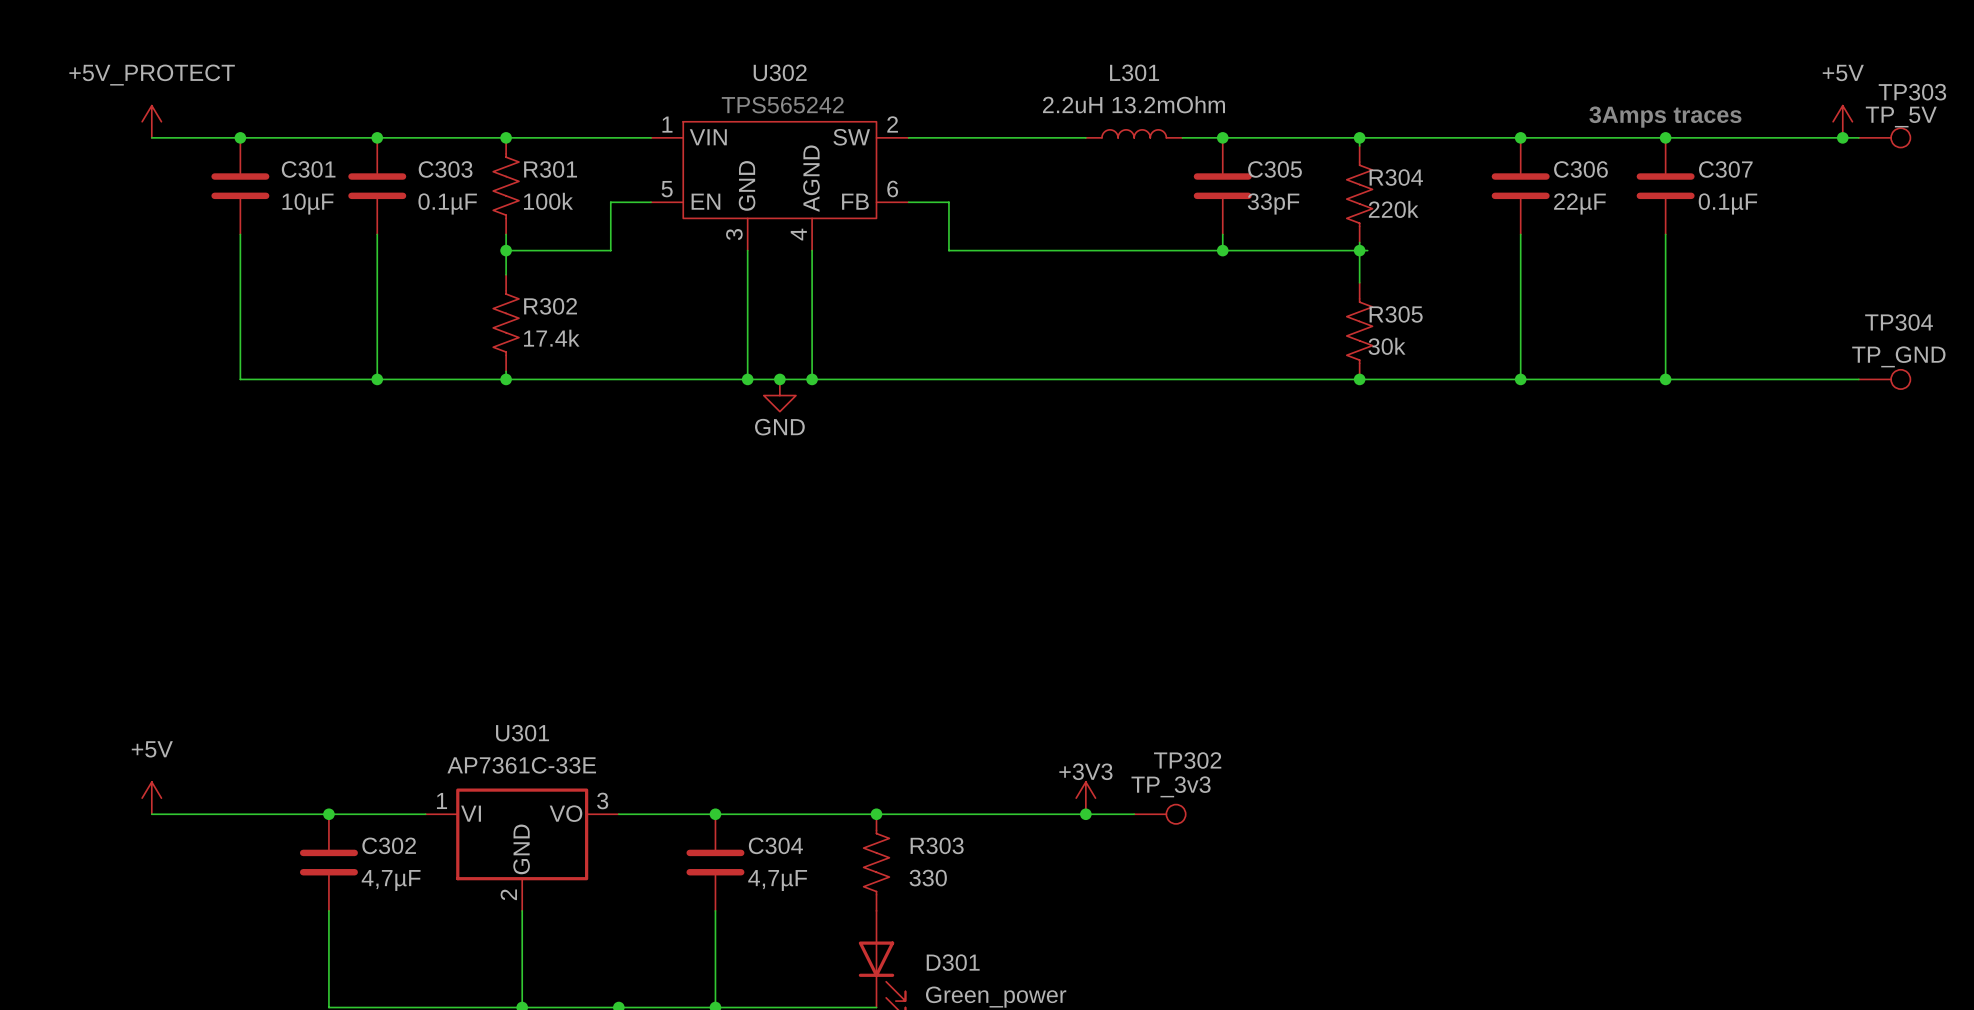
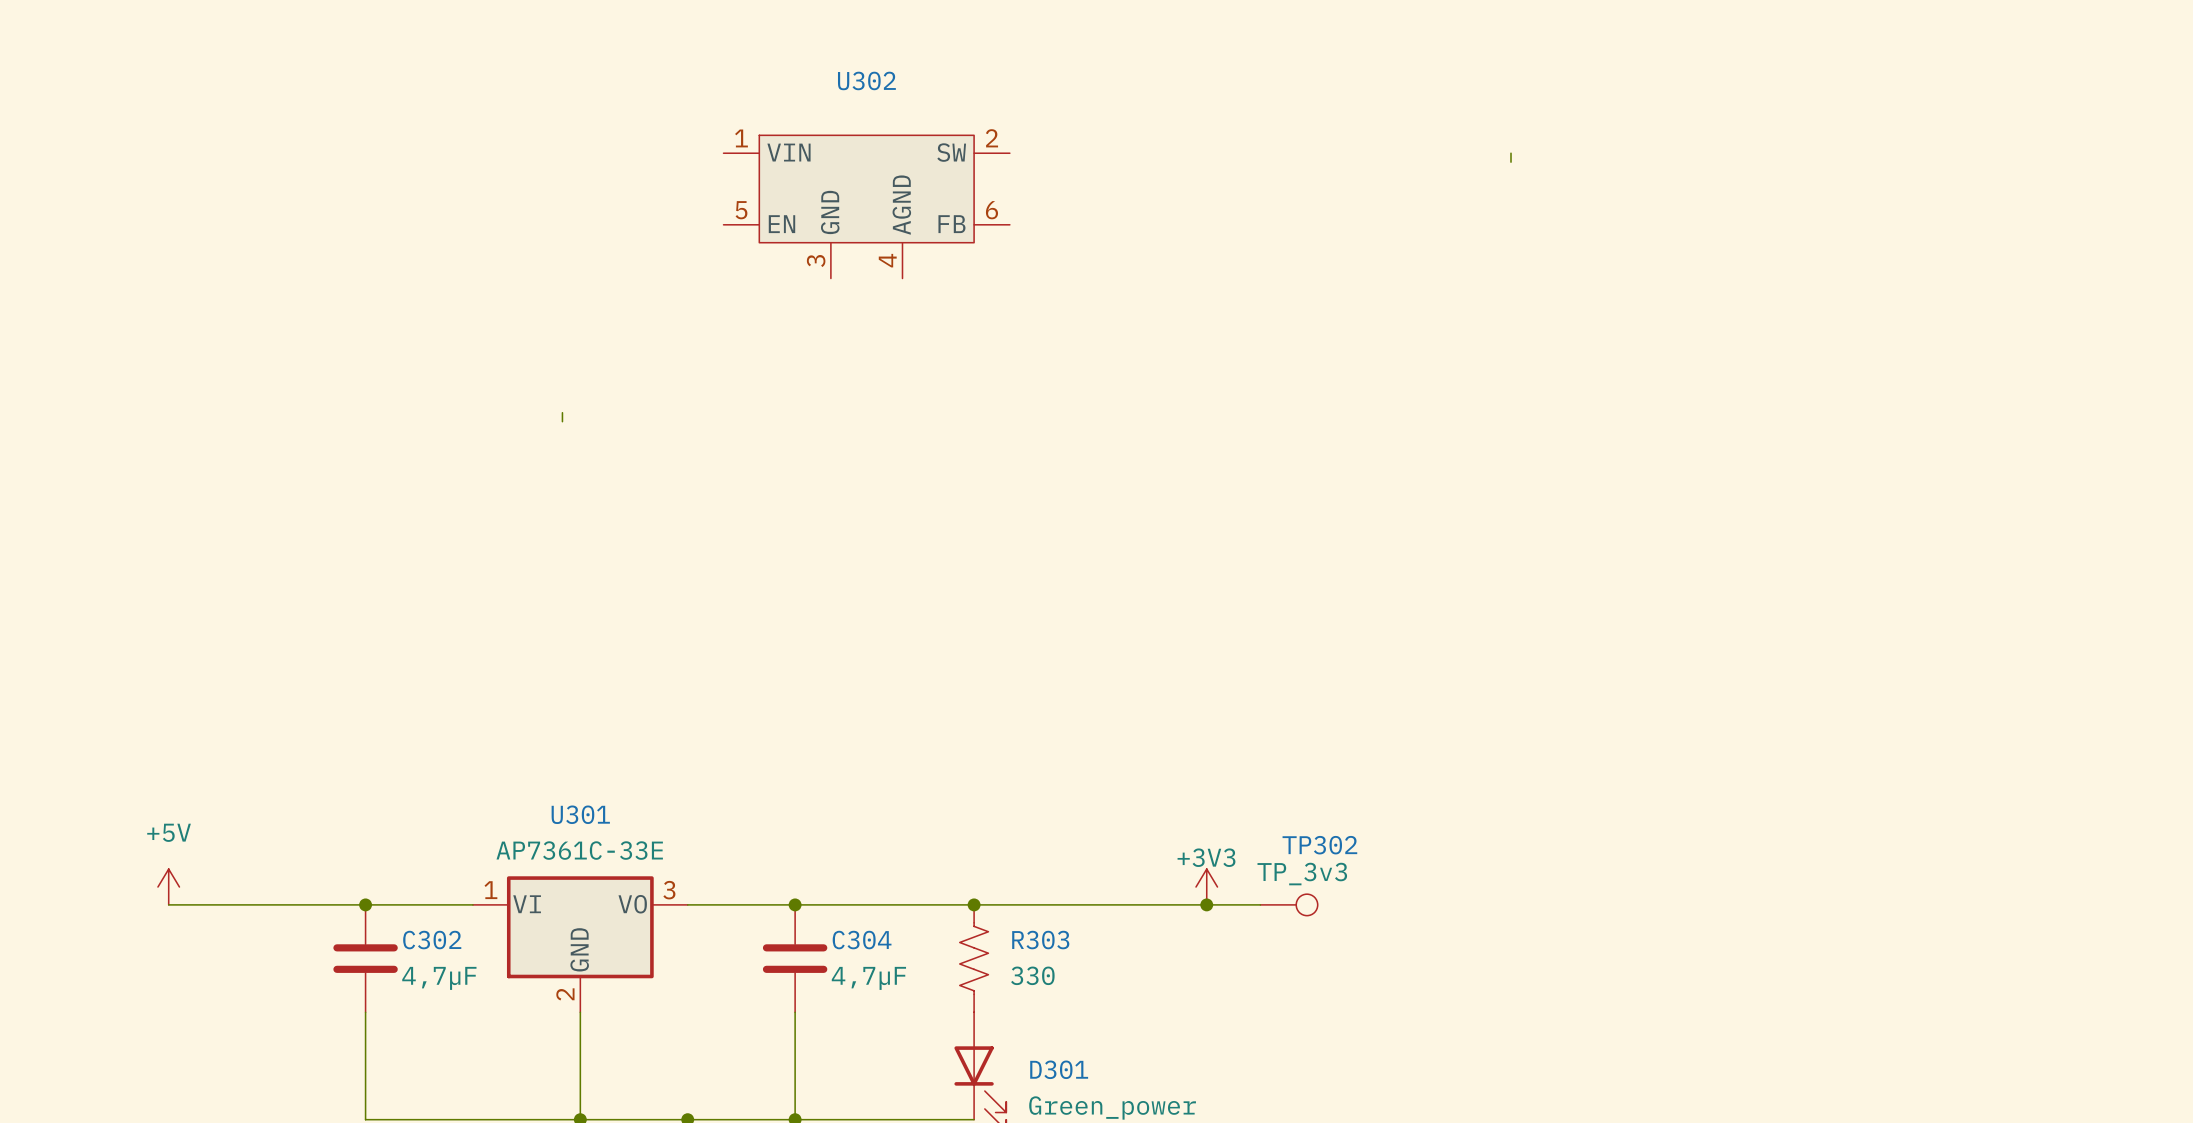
text: TPS565242 (782, 105) -> none
text: 3Amps traces (1665, 117) -> none
power symbol: +5V_PROTECT (151, 121) -> none
power symbol: +5V (1842, 121) -> none
L301: 2.2uH 13.2mOhm (1134, 133) -> none
wire: (151, 137) (651, 137) -> none
junction: (240, 137) -> none
junction: (377, 137) -> none
junction: (506, 137) -> none
wire: (908, 137) (1085, 137) -> none
wire: (1182, 137) (1858, 137) -> none
junction: (1222, 137) -> none
junction: (1359, 137) -> none
junction: (1520, 137) -> none
junction: (1665, 137) -> none
junction: (1842, 137) -> none
TP303: TP_5V (1884, 137) -> none
C301: 10µF (240, 186) -> none
C303: 0.1µF (377, 186) -> none
R301: 100k (506, 186) -> none
C305: 33pF (1222, 186) -> none
C306: 22µF (1520, 186) -> none
C307: 0.1µF (1665, 186) -> none
R304: 220k (1359, 194) -> none
wire: (651, 202) (610, 202) (610, 250) (506, 250) -> none
wire: (908, 202) (948, 202) (948, 250) (1367, 250) -> none
wire: (240, 234) (240, 379) (1858, 379) -> none
wire: (377, 234) (377, 379) -> none
wire: (506, 234) (506, 274) -> none
wire: (1222, 234) (1222, 250) -> none
wire: (1520, 234) (1520, 379) -> none
wire: (1665, 234) (1665, 379) -> none
wire: (1359, 242) (1359, 282) -> none
junction: (506, 250) -> none
wire: (747, 250) (747, 379) -> none
wire: (812, 250) (812, 379) -> none
junction: (1222, 250) -> none
junction: (1359, 250) -> none
R302: 17.4k (506, 323) -> none
R305: 30k (1359, 331) -> none
junction: (377, 379) -> none
junction: (506, 379) -> none
junction: (747, 379) -> none
junction: (779, 379) -> none
junction: (812, 379) -> none
junction: (1359, 379) -> none
junction: (1520, 379) -> none
junction: (1665, 379) -> none
TP304: TP_GND (1884, 379) -> none
power symbol: GND (779, 395) -> none

